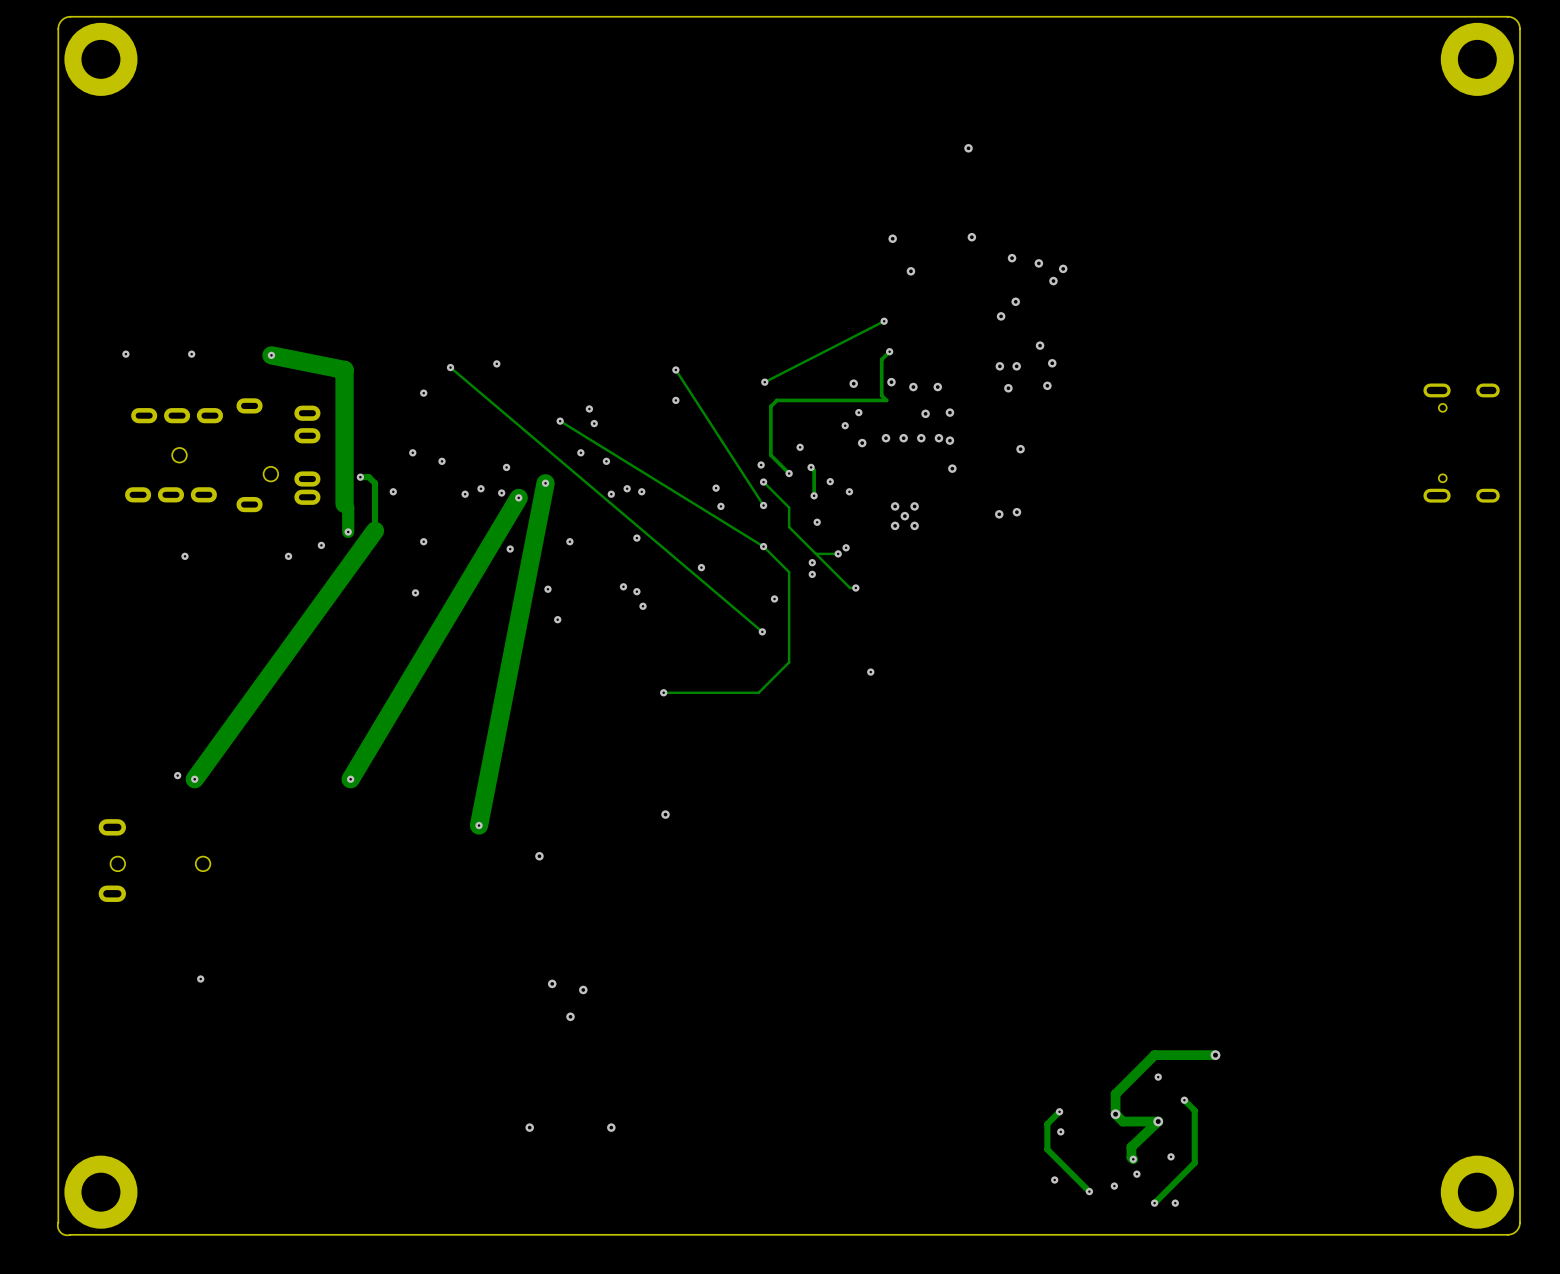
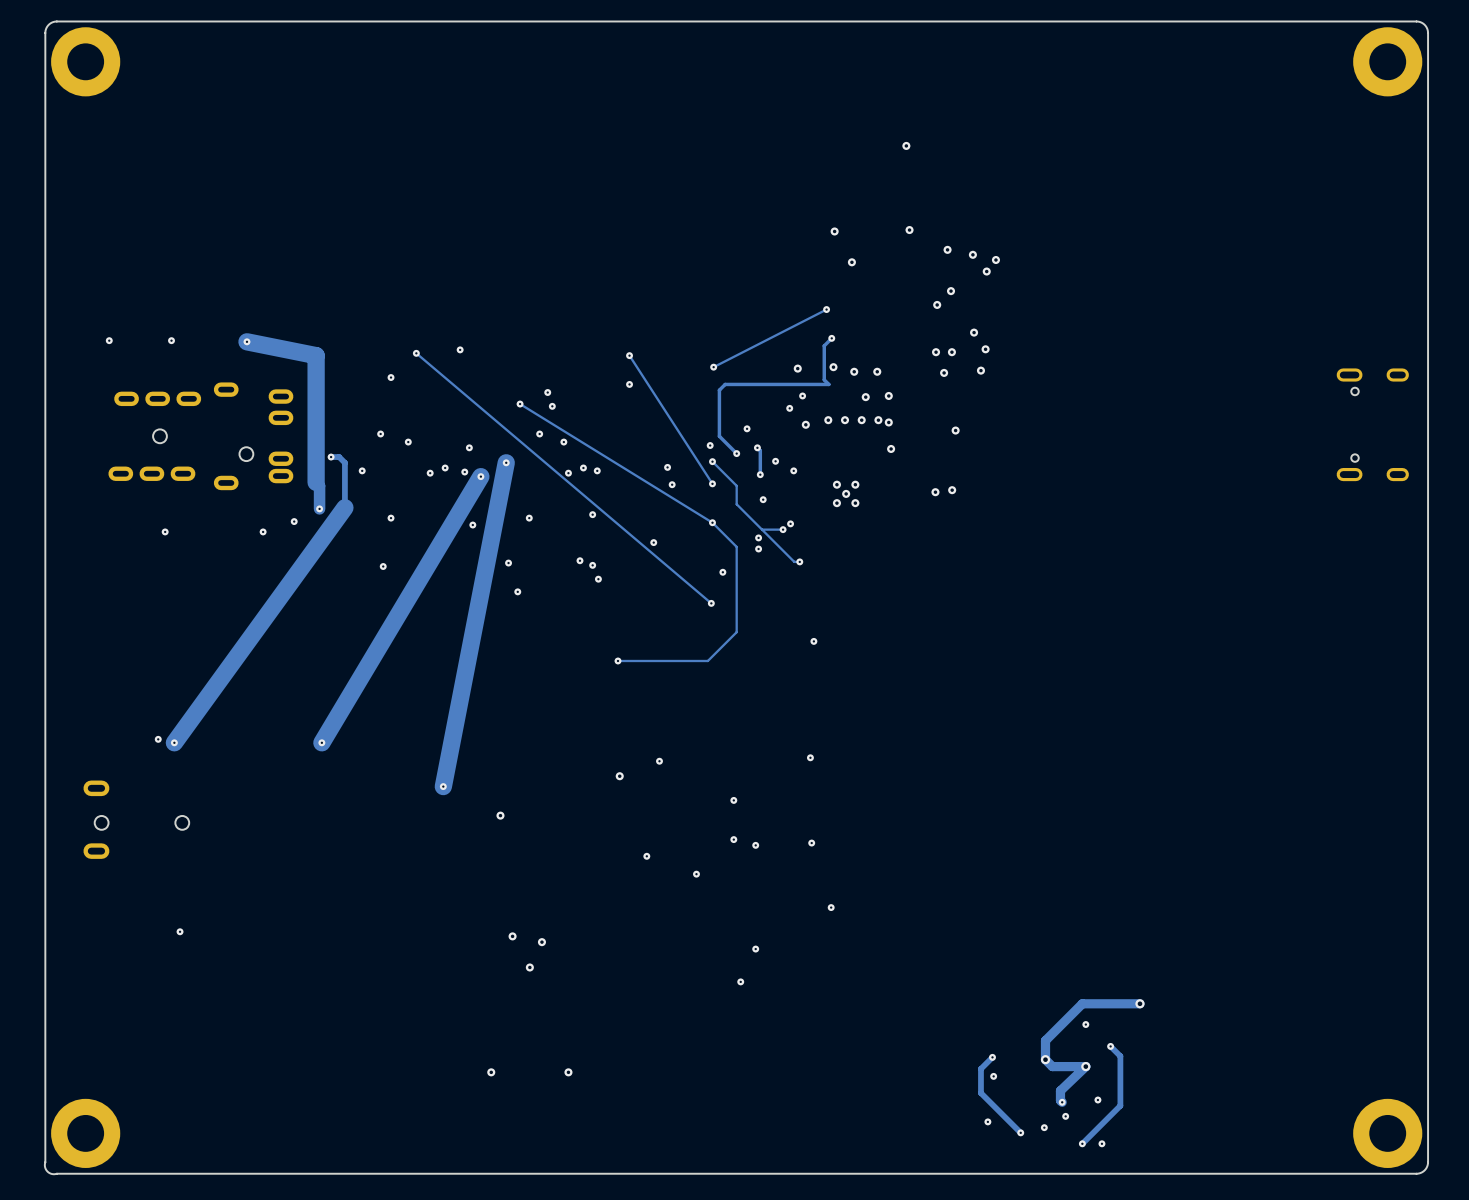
via: none -> (810, 757)
via: none -> (659, 761)
via: none -> (733, 800)
via: none -> (733, 839)
via: none -> (811, 843)
via: none -> (755, 845)
via: none -> (646, 856)
via: none -> (696, 874)
via: none -> (831, 907)
via: none -> (755, 949)
via: none -> (740, 981)

